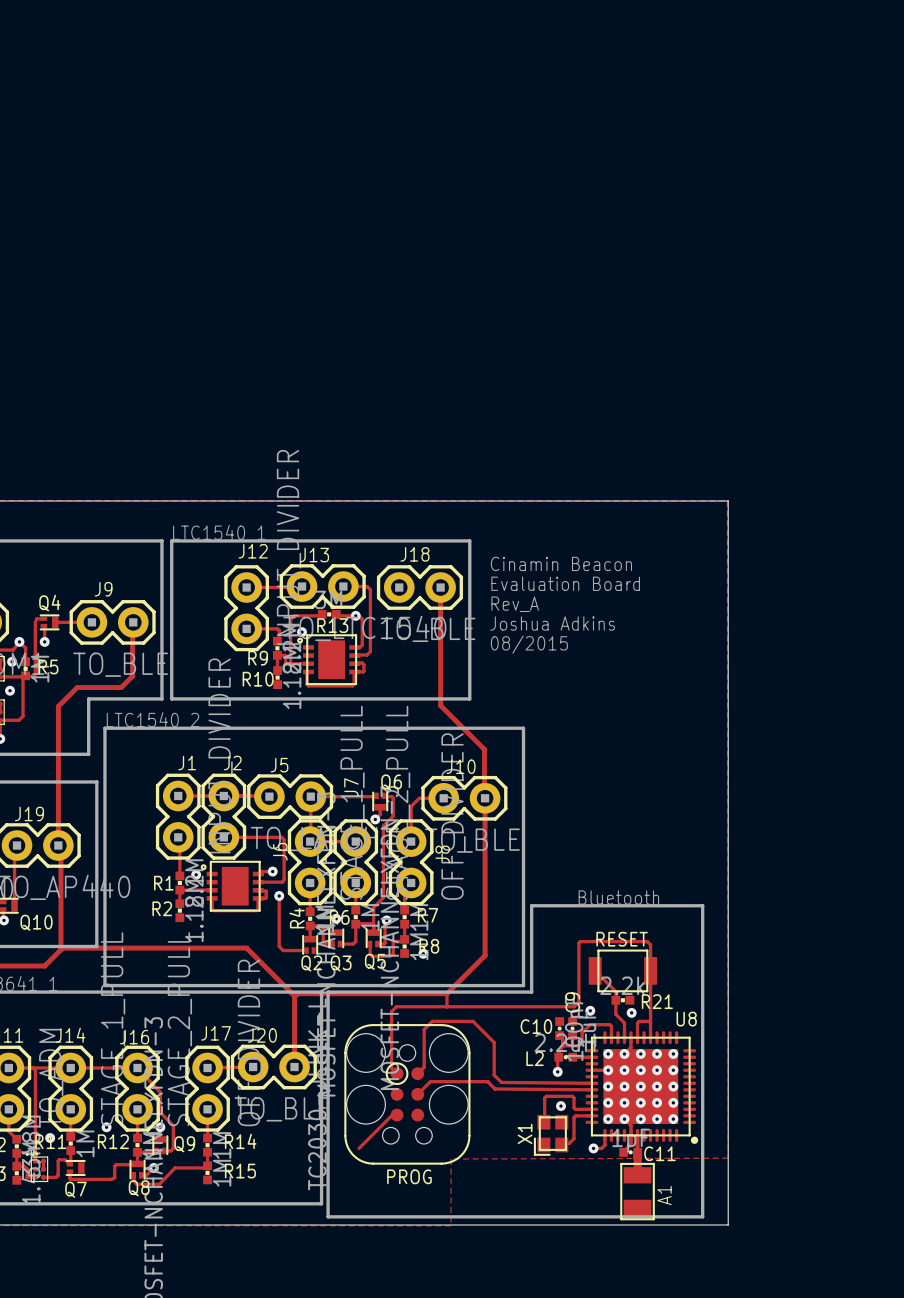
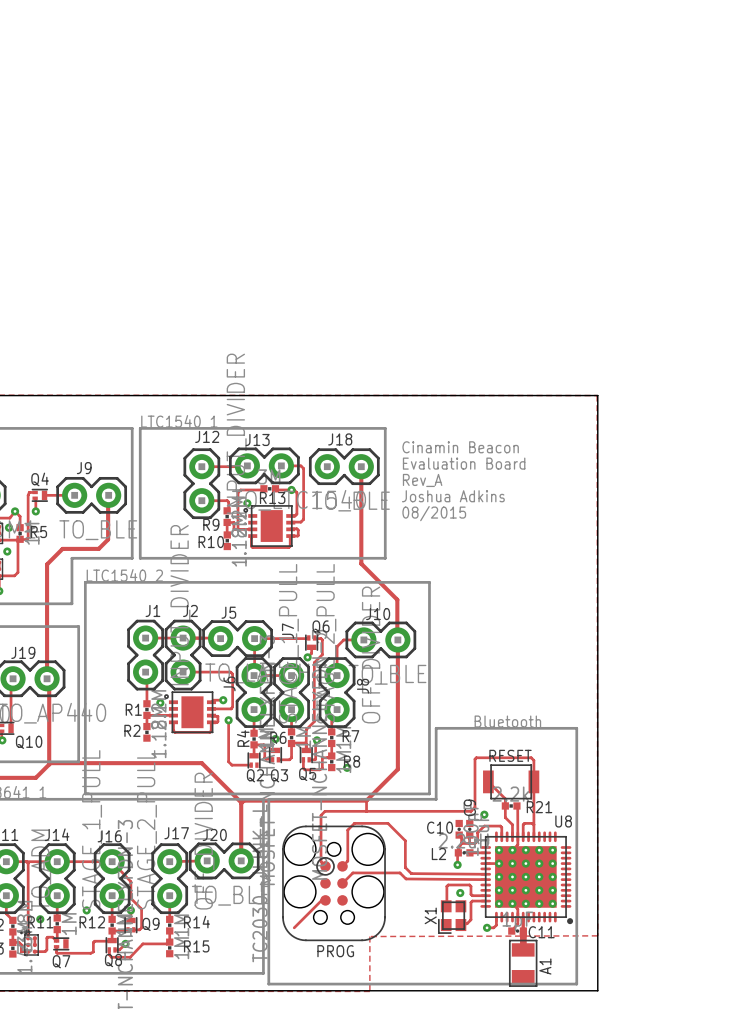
track: none -> (517, 806) (517, 836)
via: (631, 1012) -> none

